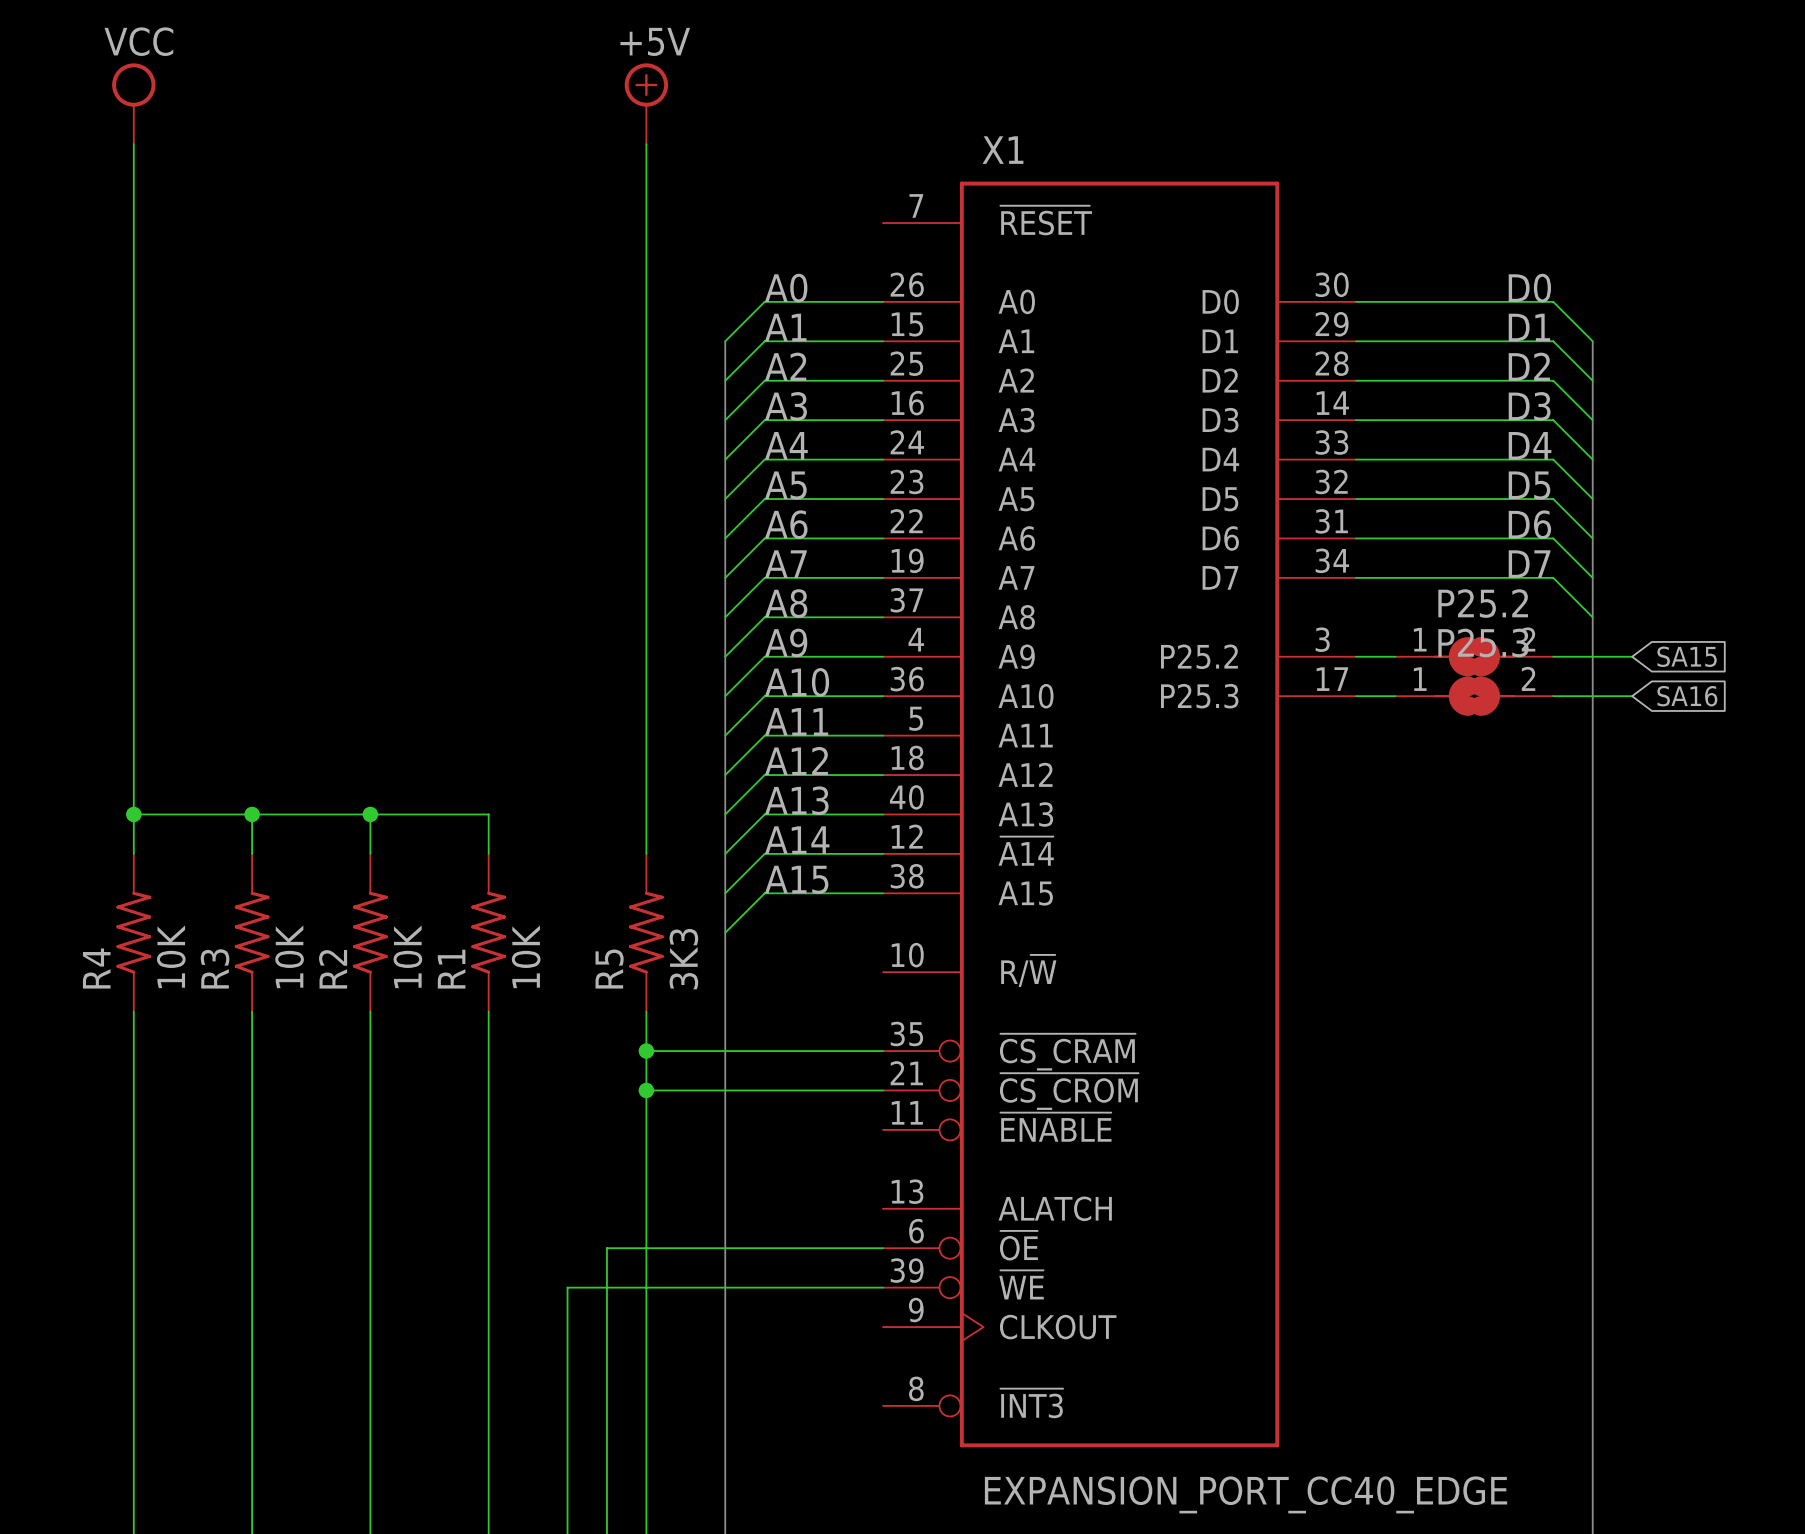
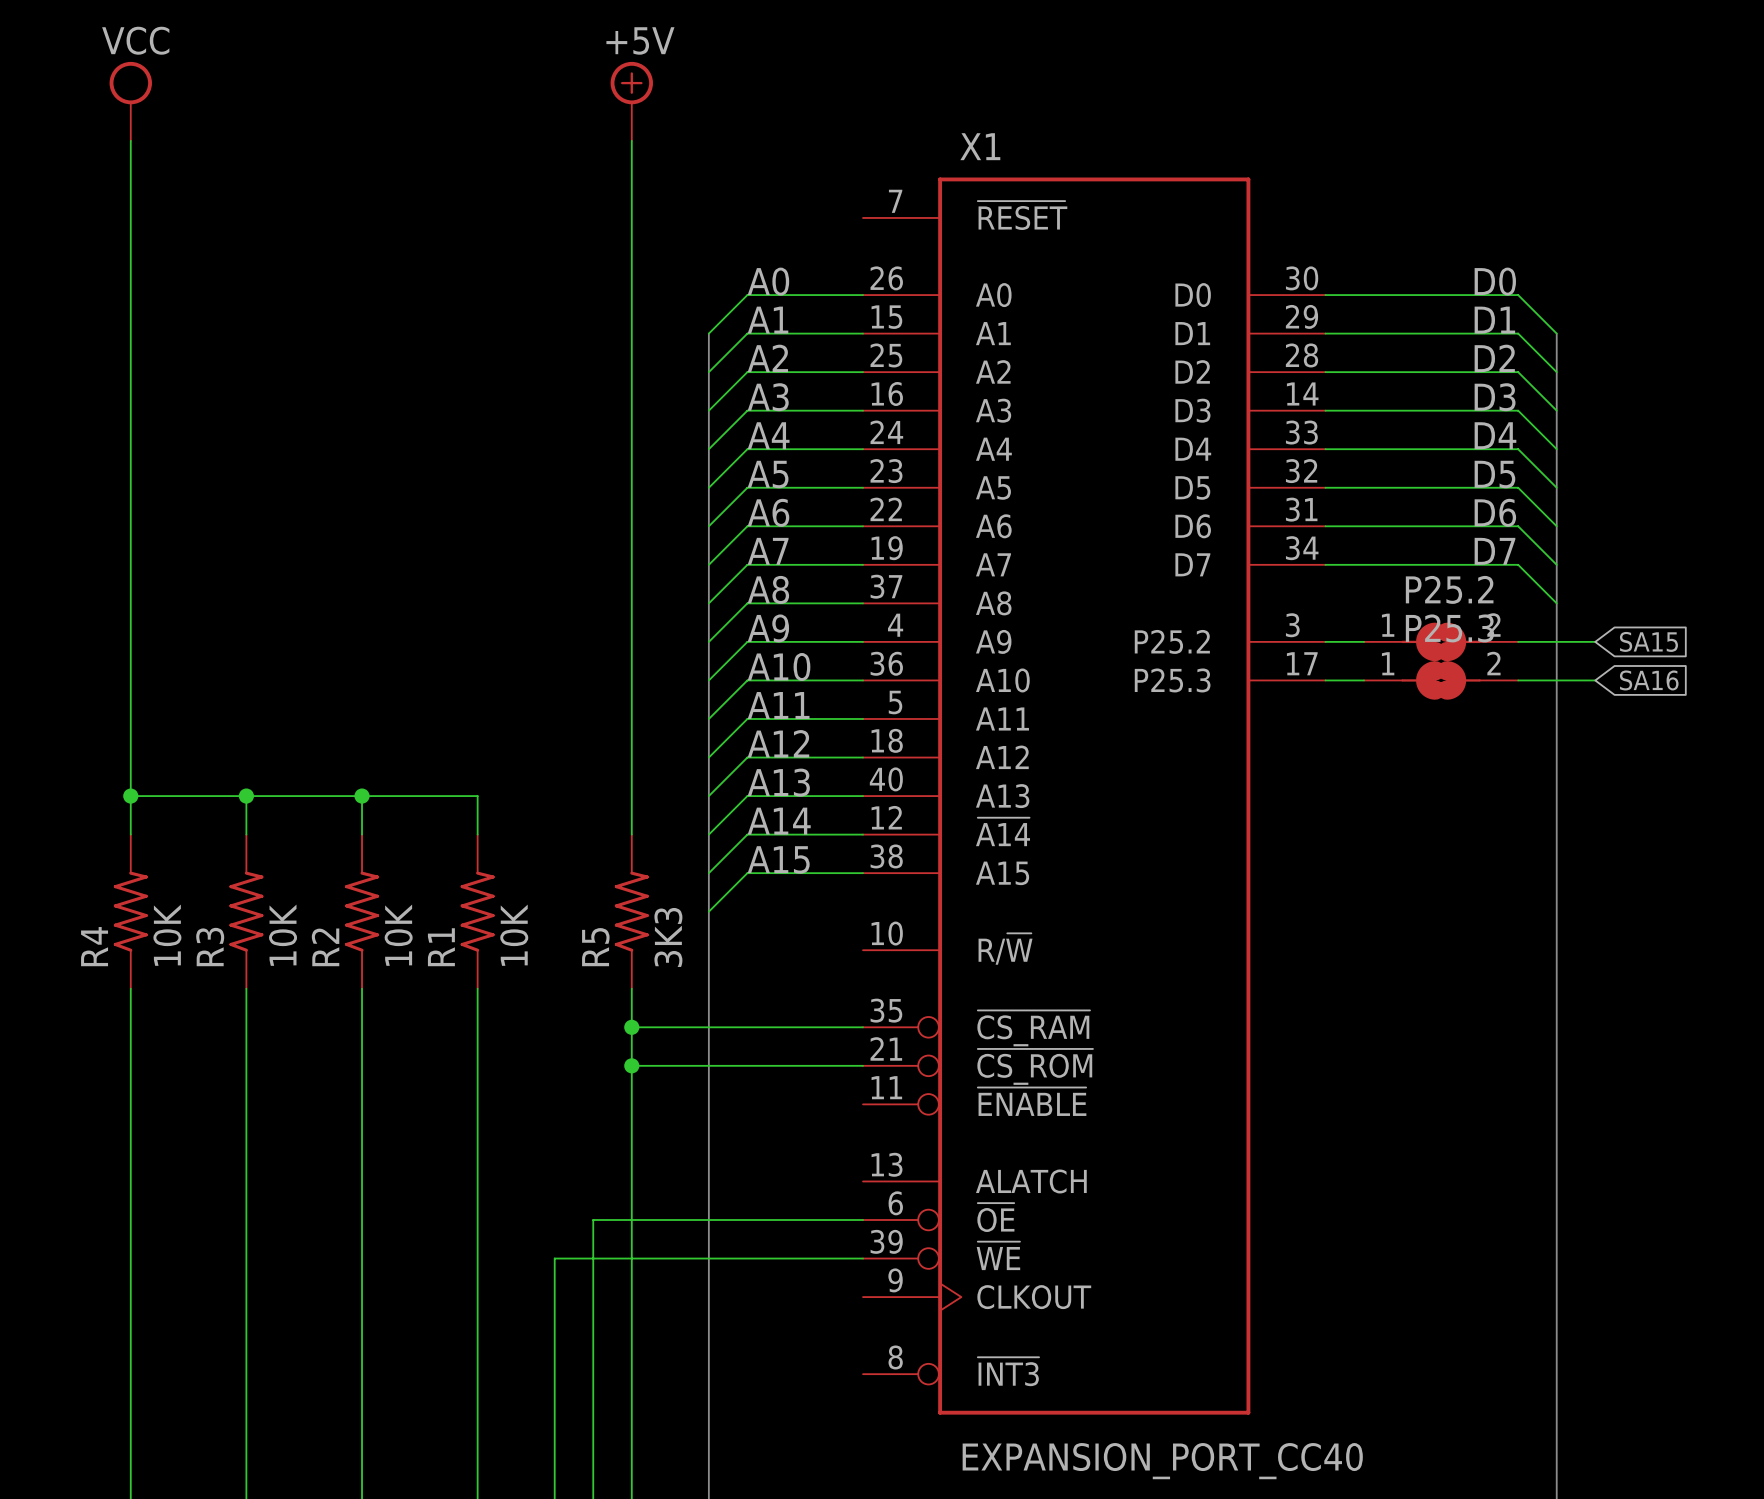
X1 pin name: ~{CS_CRAM} (1067, 1052) -> ~{CS_RAM} (1033, 1028)
X1 pin name: ~{CS_CROM} (1069, 1091) -> ~{CS_ROM} (1035, 1066)
X1 value: EXPANSION_PORT_CC40_EDGE (1246, 1494) -> EXPANSION_PORT_CC40 (1162, 1461)

